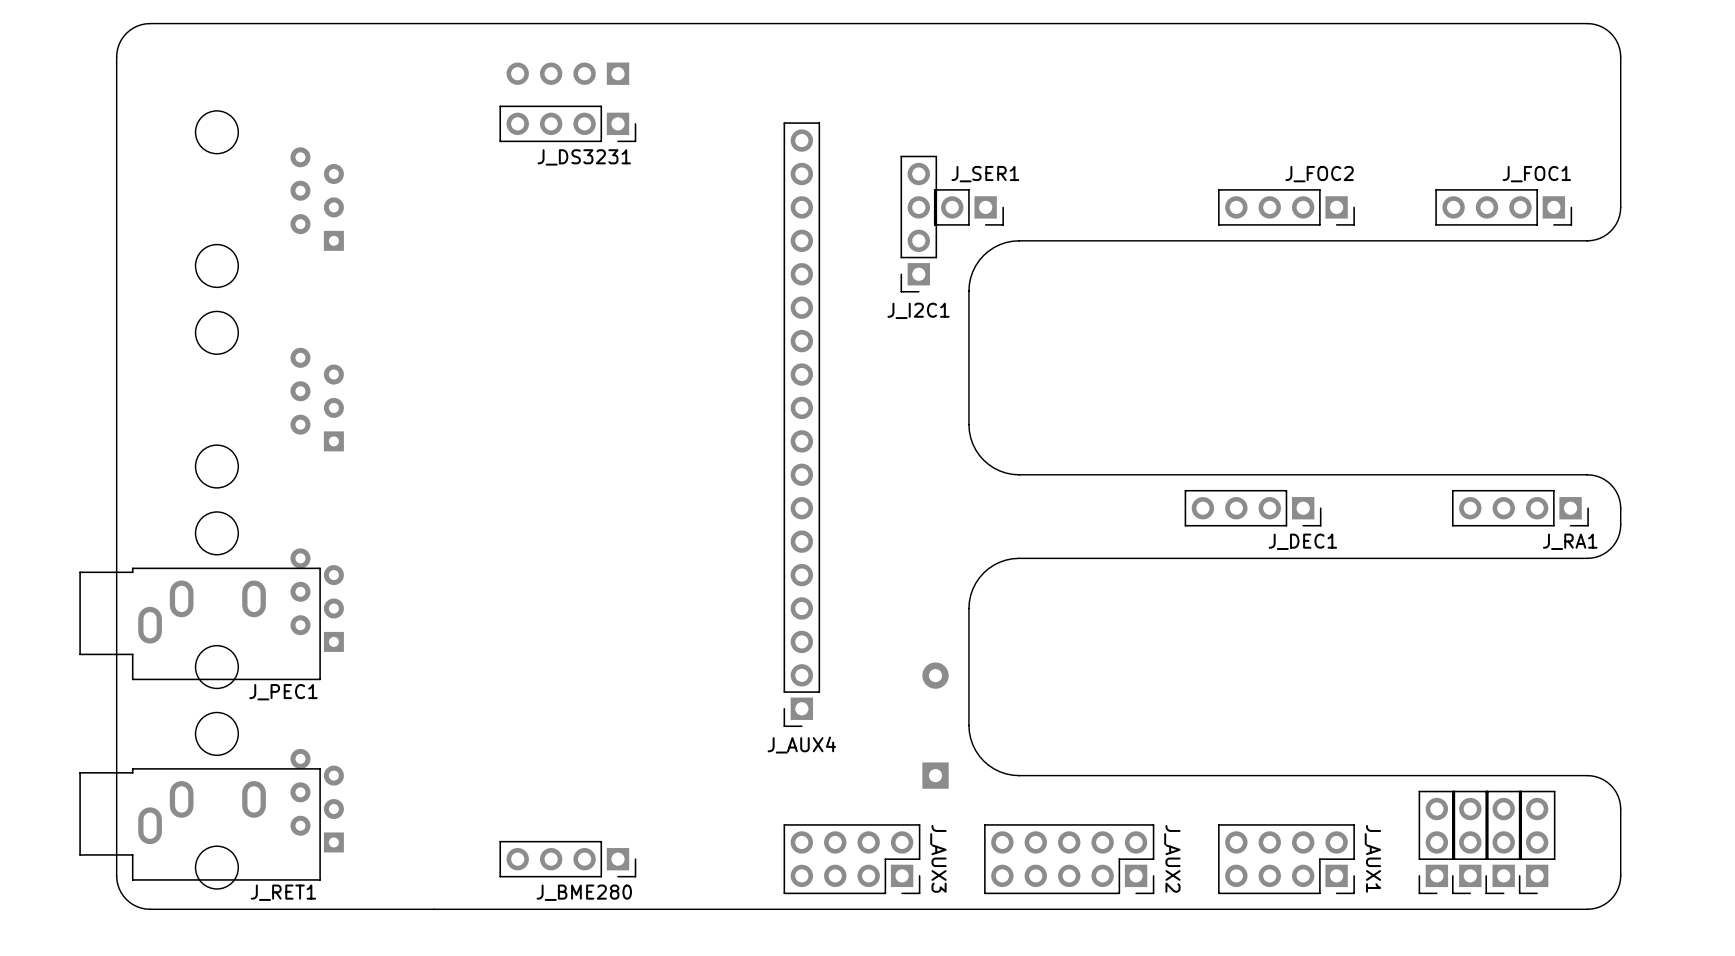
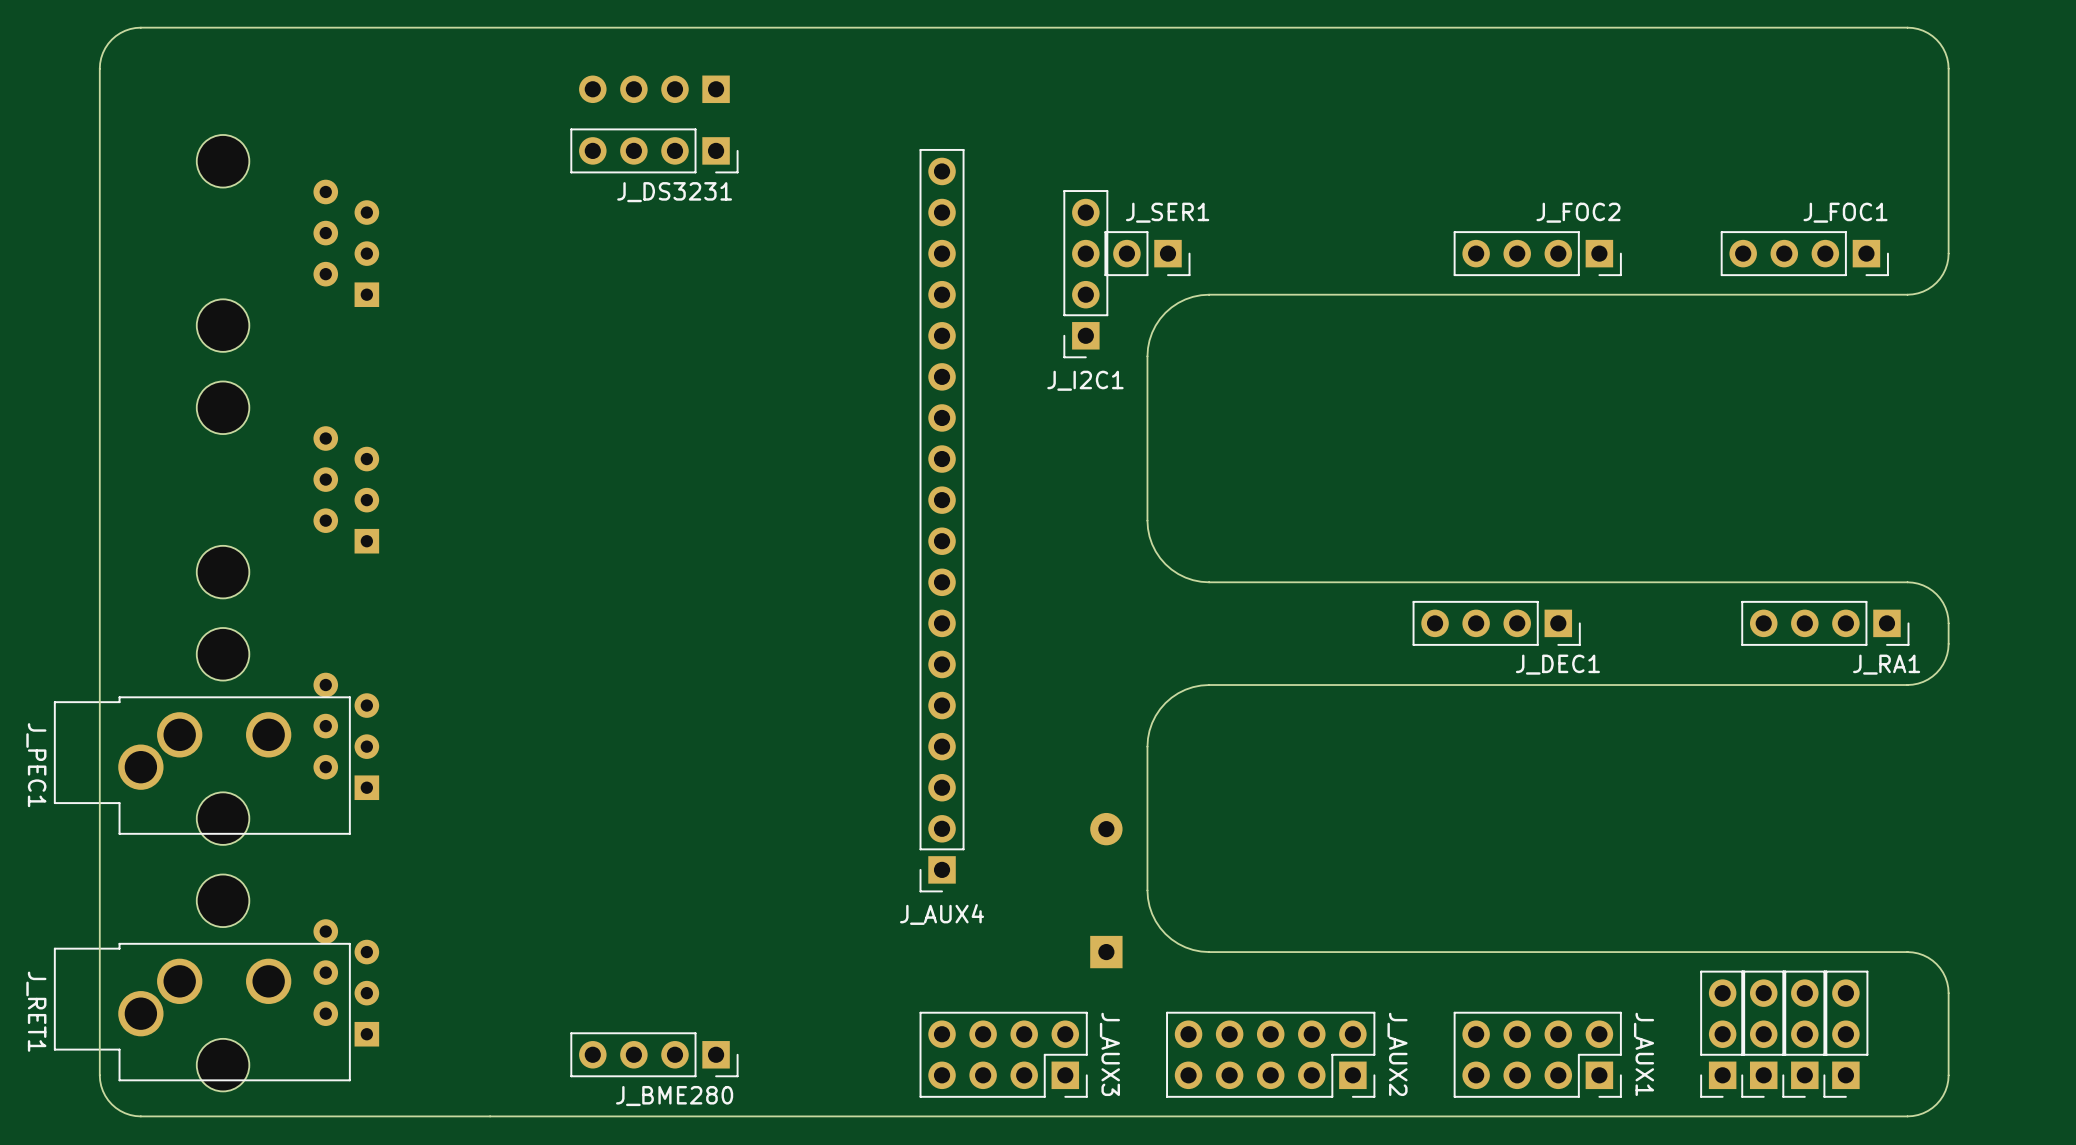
J_PEC1 footprint: [79, 567, 321, 681] -> [53, 696, 351, 835]
J_PEC1 name position: J_PEC1 (283, 692) -> J_PEC1 (36, 765)
J_RET1 footprint: [79, 768, 321, 881] -> [53, 942, 351, 1082]
J_RET1 name position: J_RET1 (283, 892) -> J_RET1 (36, 1011)

